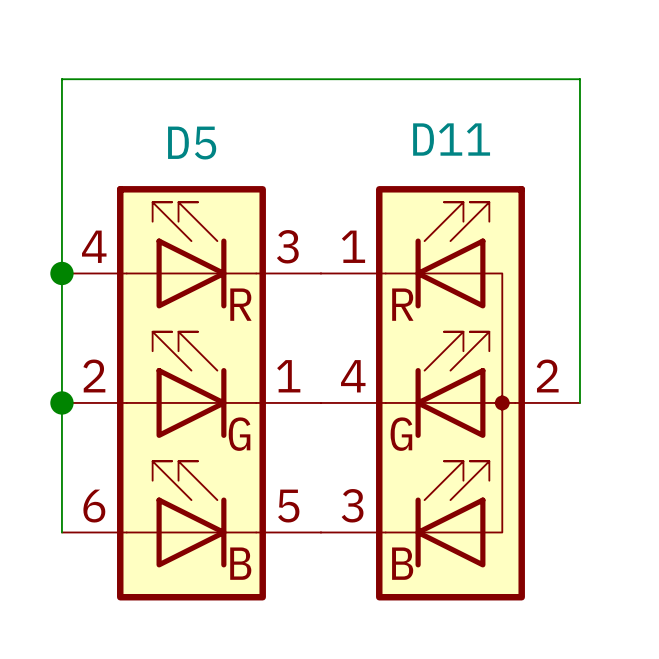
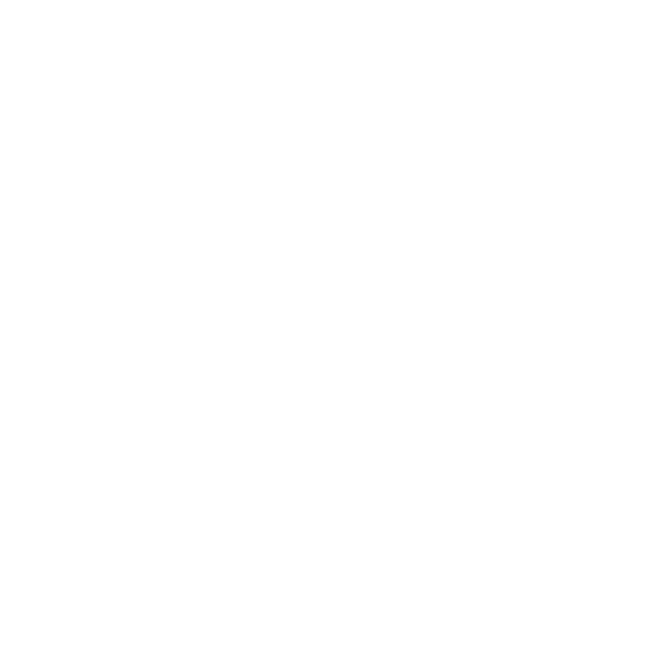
junction: (61, 273) -> none
D5: (191, 393) -> none
D11: (450, 393) -> none
junction: (61, 402) -> none
wire: (579, 402) (579, 79) (61, 79) (61, 532) -> none

